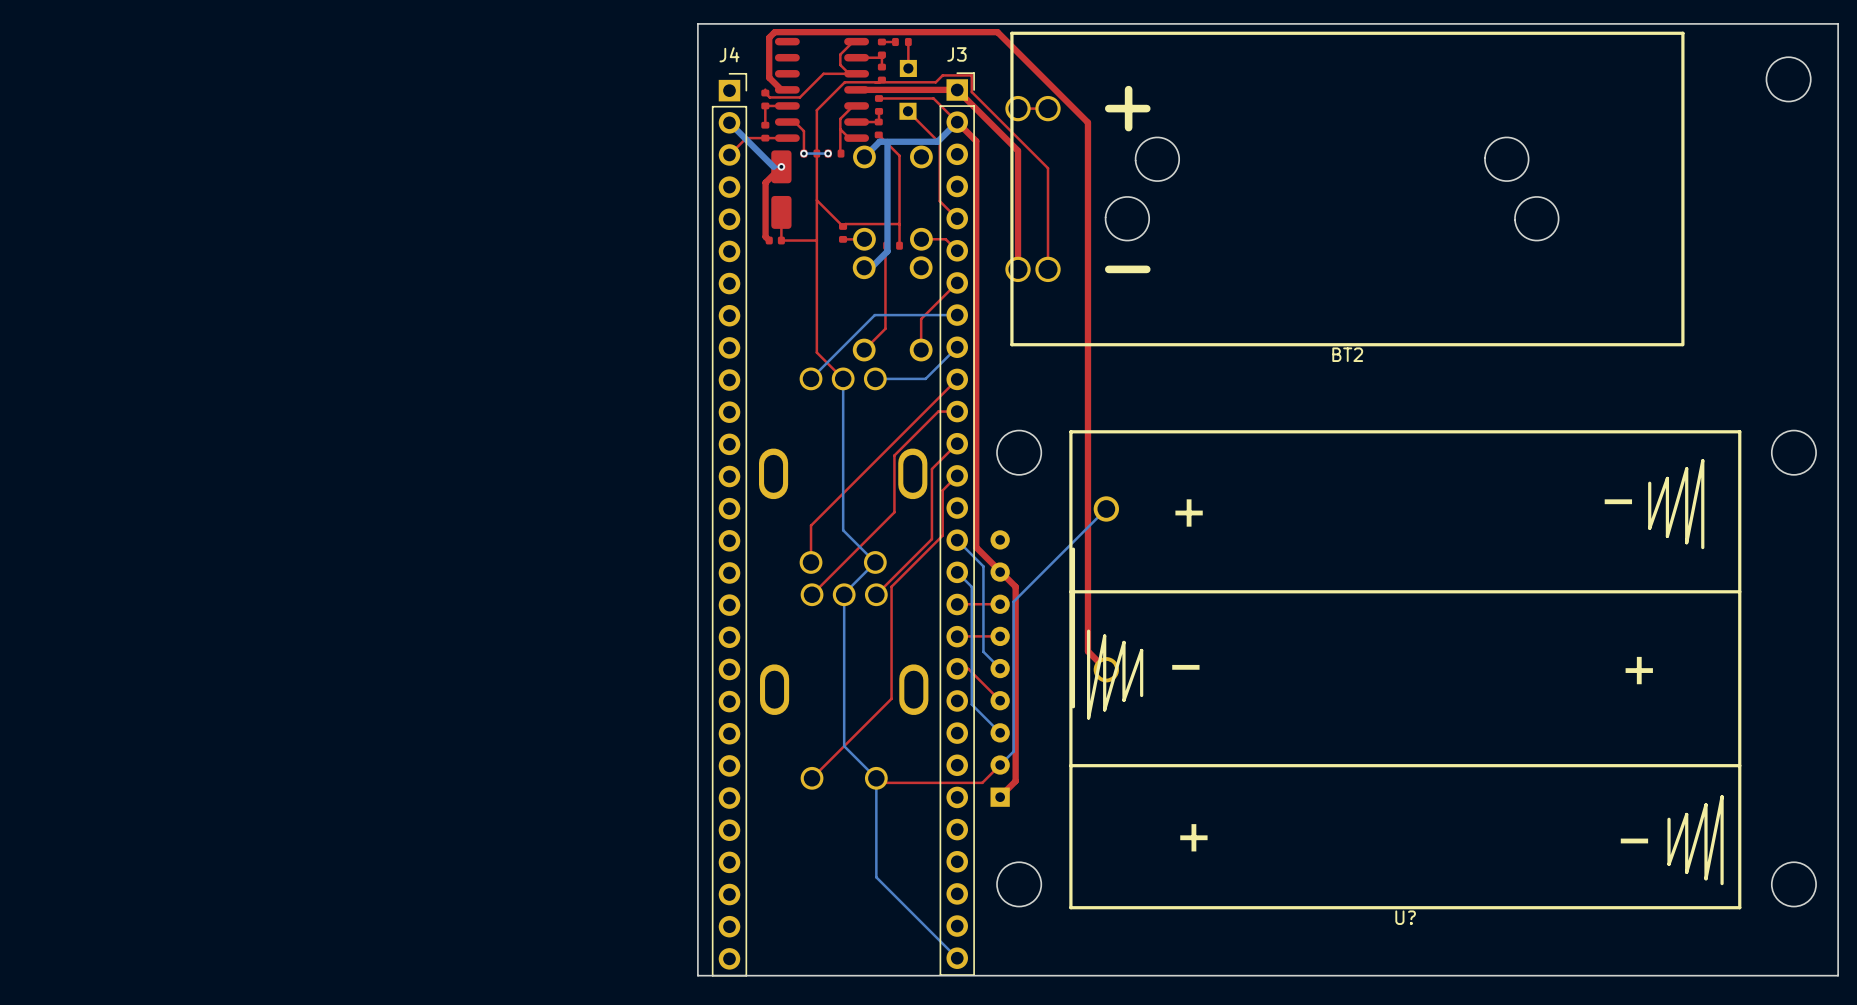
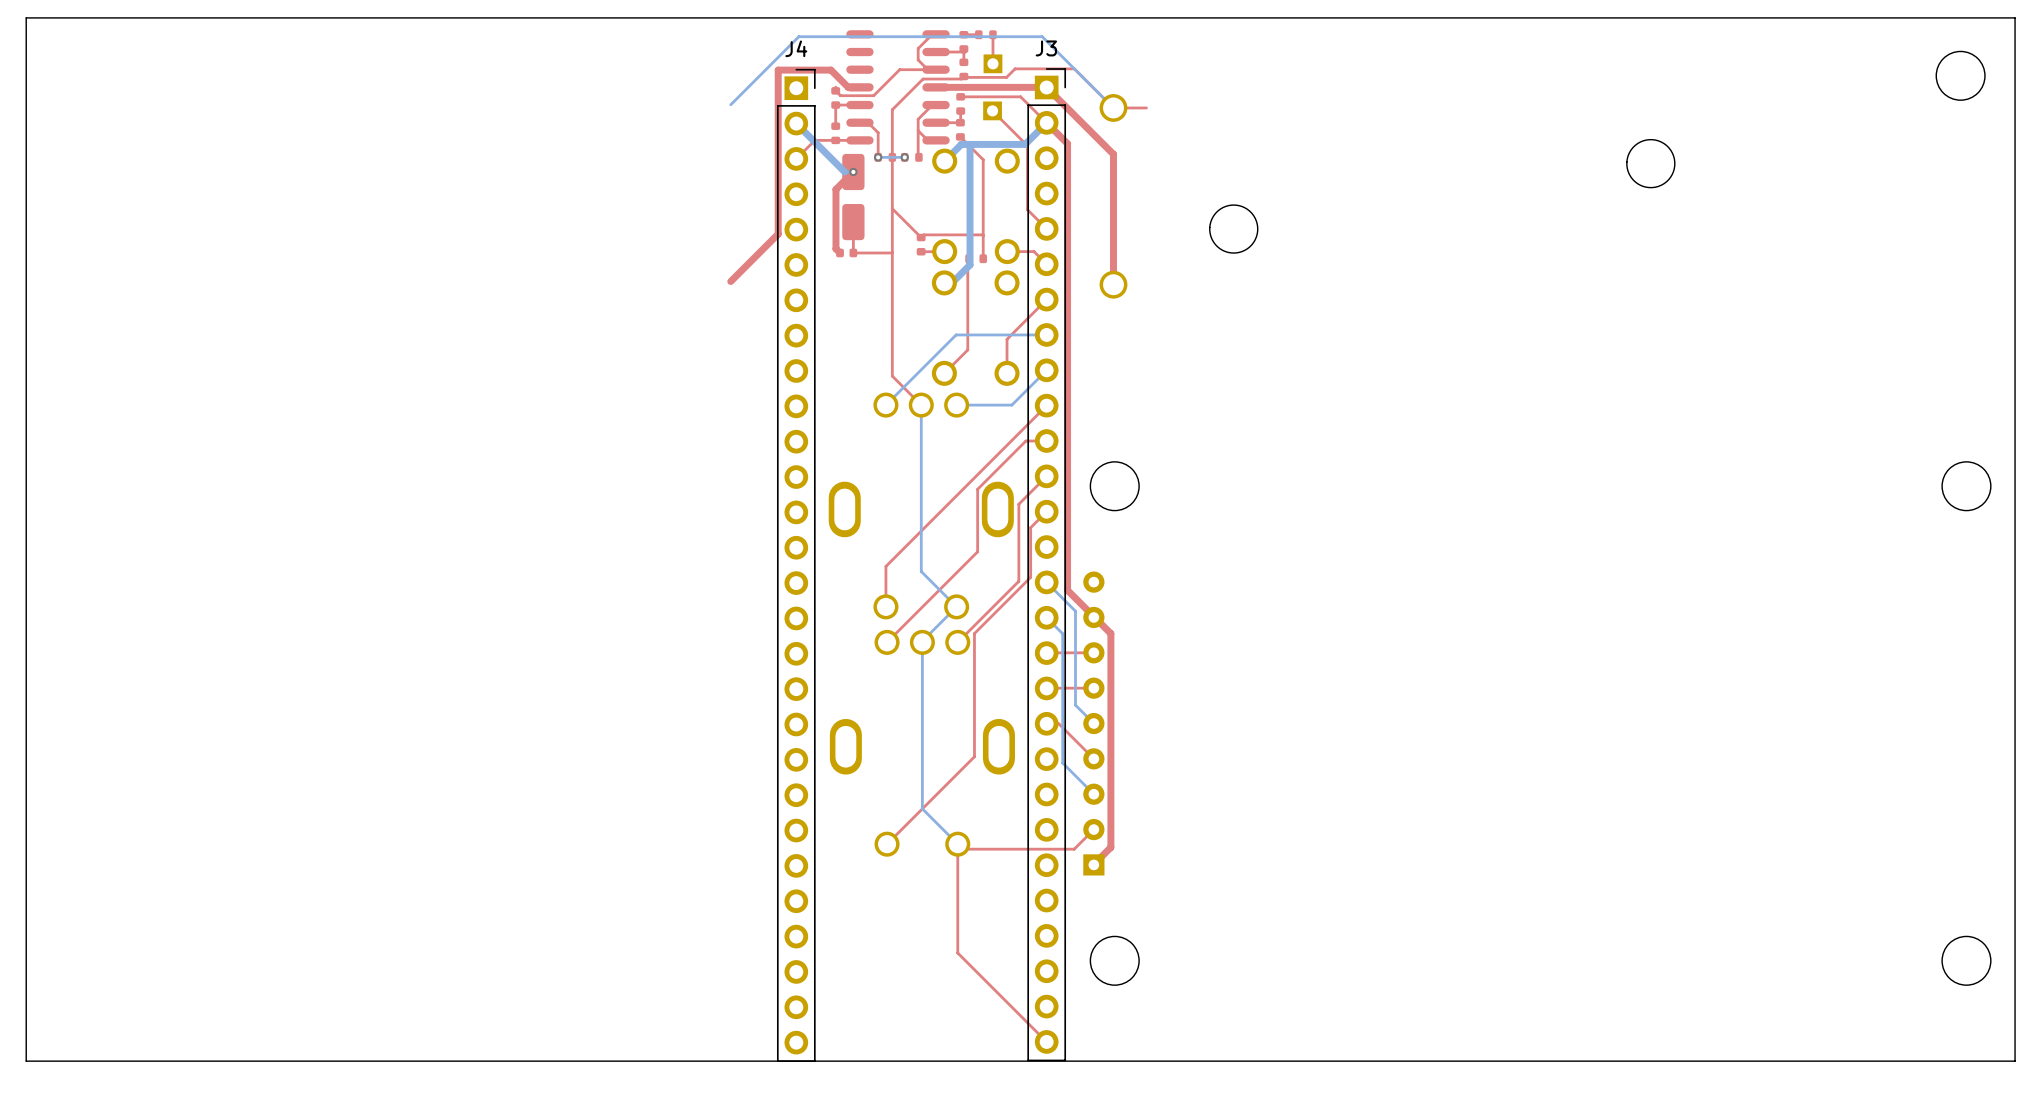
board edge: (1838, 26) (1838, 23) (697, 23) (697, 975) -> (2015, 17) (26, 17) (26, 1061) (761, 1061)
top track: none -> (964, 77) (1006, 77) (1015, 68) (1074, 68) (1113, 107)
top track: (879, 82) (935, 82) (942, 75) (971, 75) (971, 92) (1048, 168) (1048, 269) -> none
top track: (781, 89) (769, 77) (769, 37) (774, 32) (997, 32) (1087, 122) (1087, 651) (1106, 669) -> (853, 87) (848, 87) (830, 70) (778, 70) (778, 234) (730, 281)
bottom track: none -> (730, 104) (798, 36) (1042, 36) (1113, 107)
BT2: (1347, 189) -> none
bottom track: (1106, 508) (1013, 601) (1013, 751) (1000, 765) -> none
U?: (1405, 669) -> none
top track: none -> (957, 844) (957, 953) (1046, 1041)
bottom track: (876, 778) (876, 877) (957, 958) -> none

